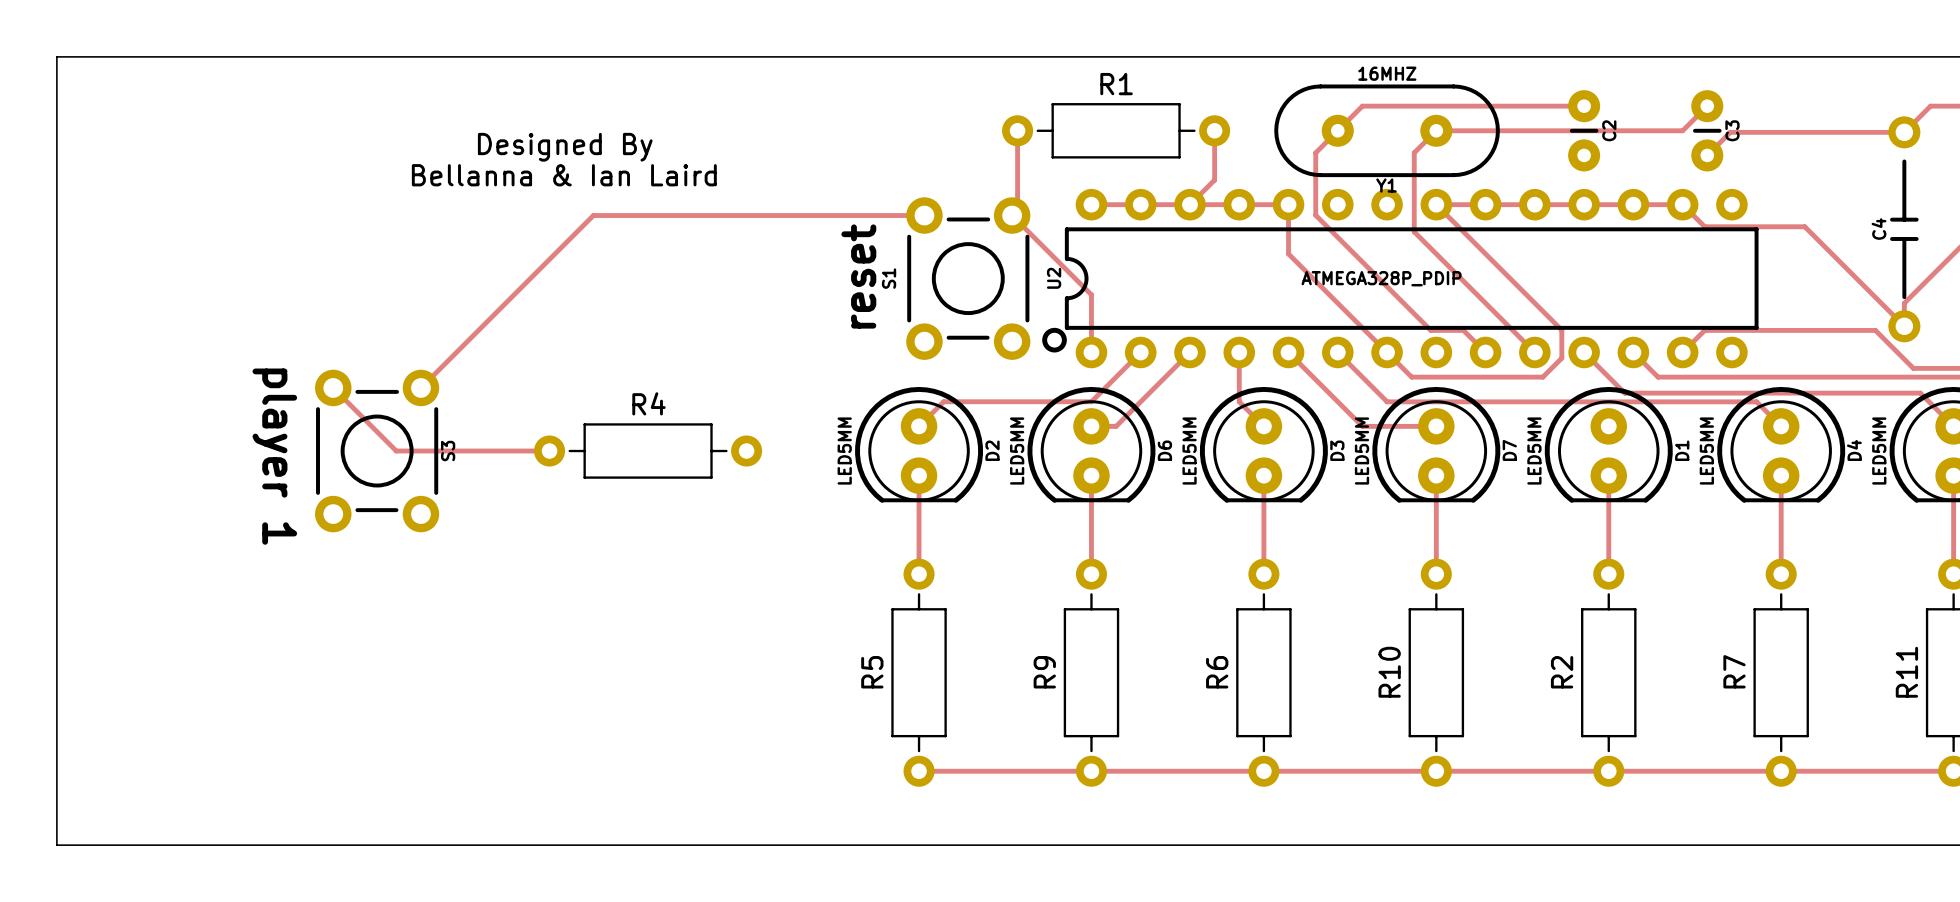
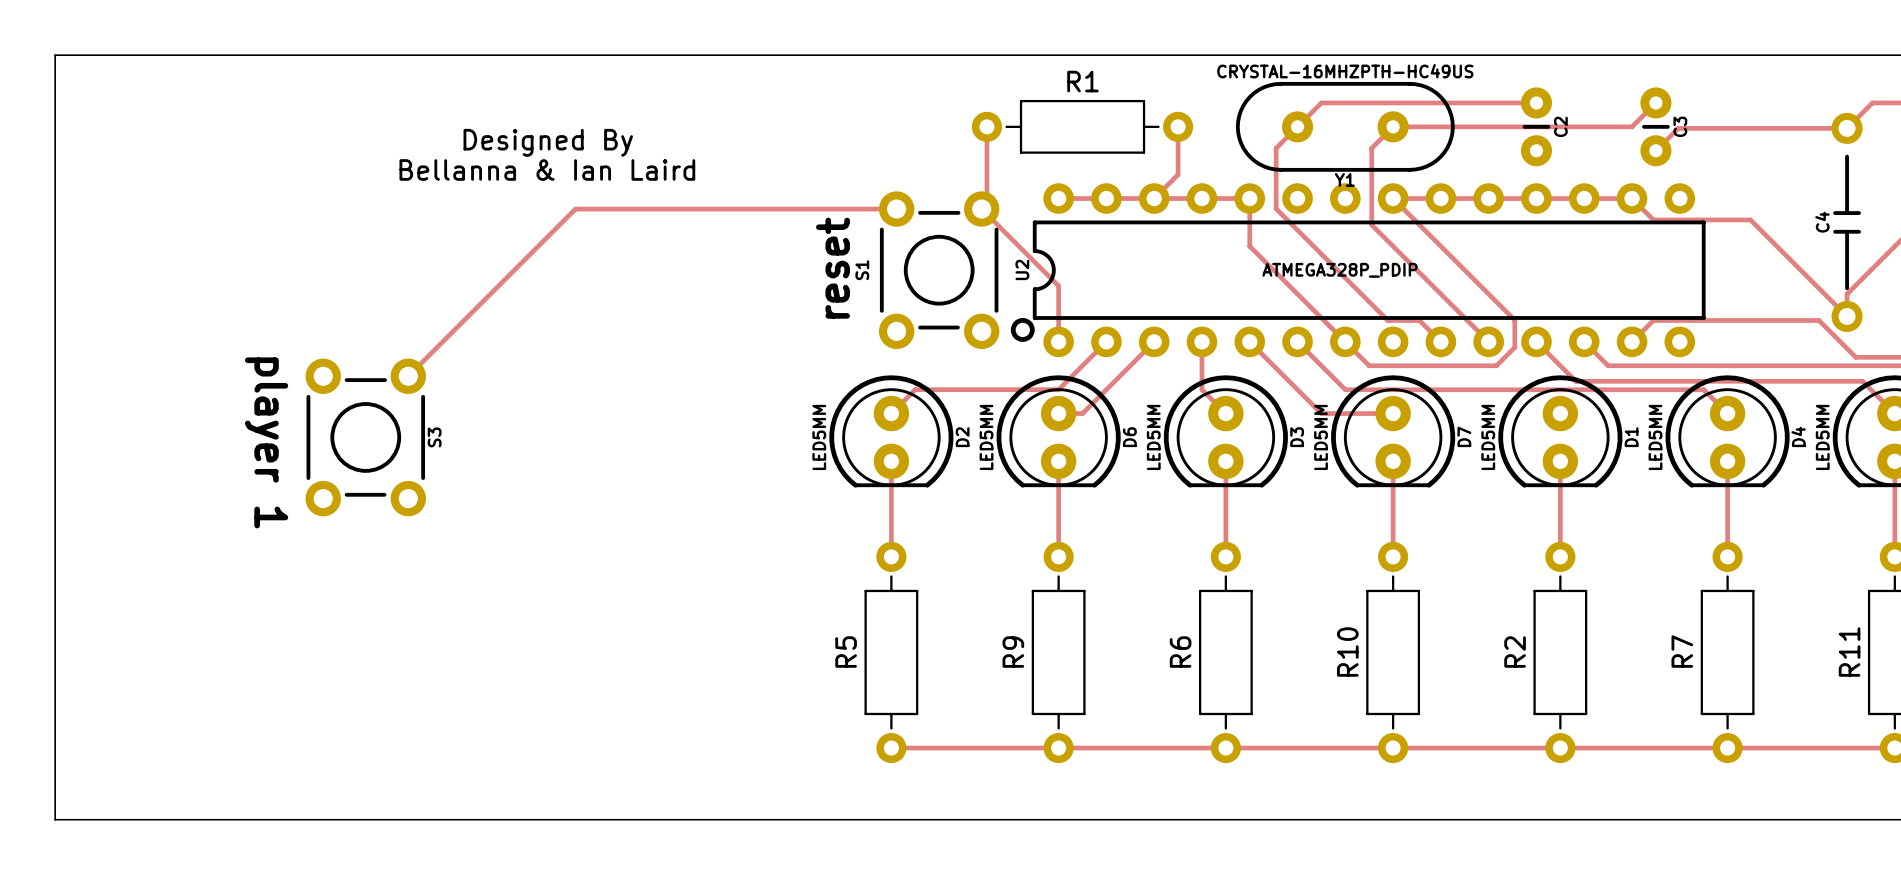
Y1 value: 16MHZ (1387, 73) -> CRYSTAL-16MHZPTH-HC49US (1345, 71)
track: (333, 387) (396, 451) (549, 451) -> none
R4: (648, 451) -> none

